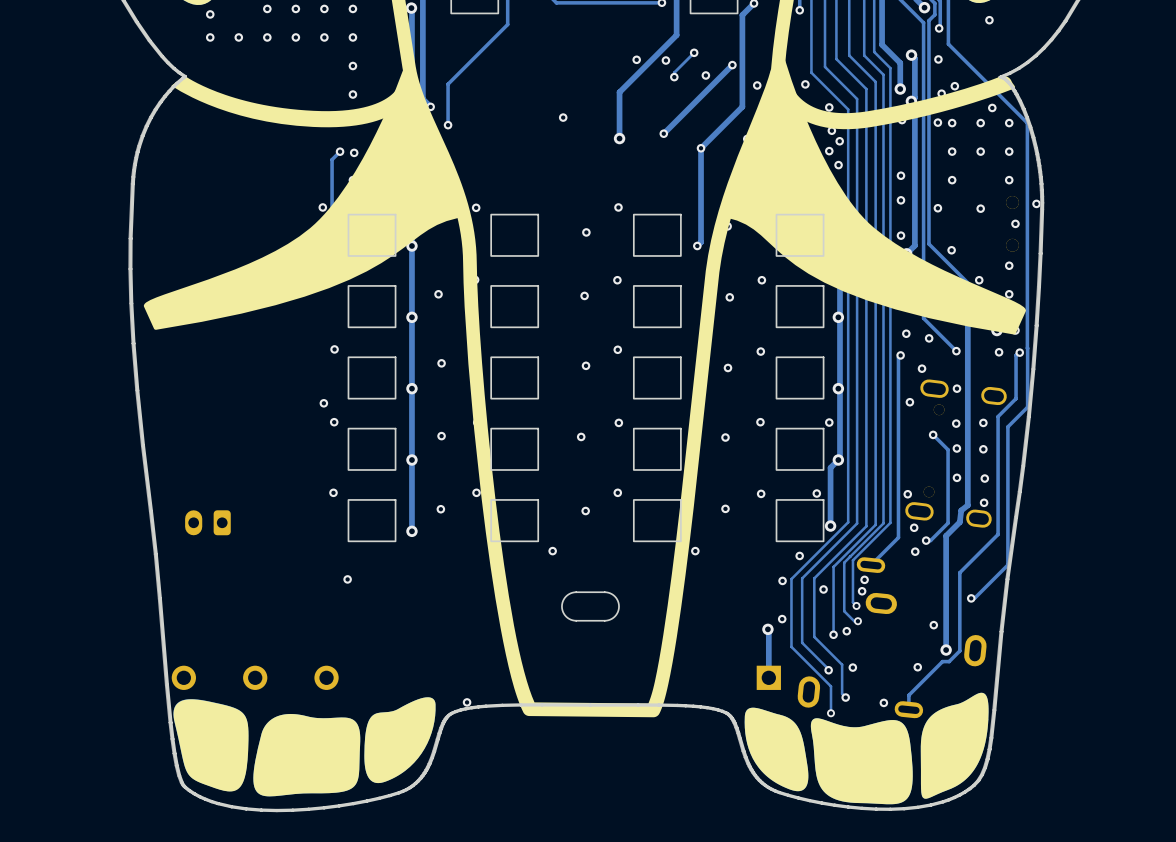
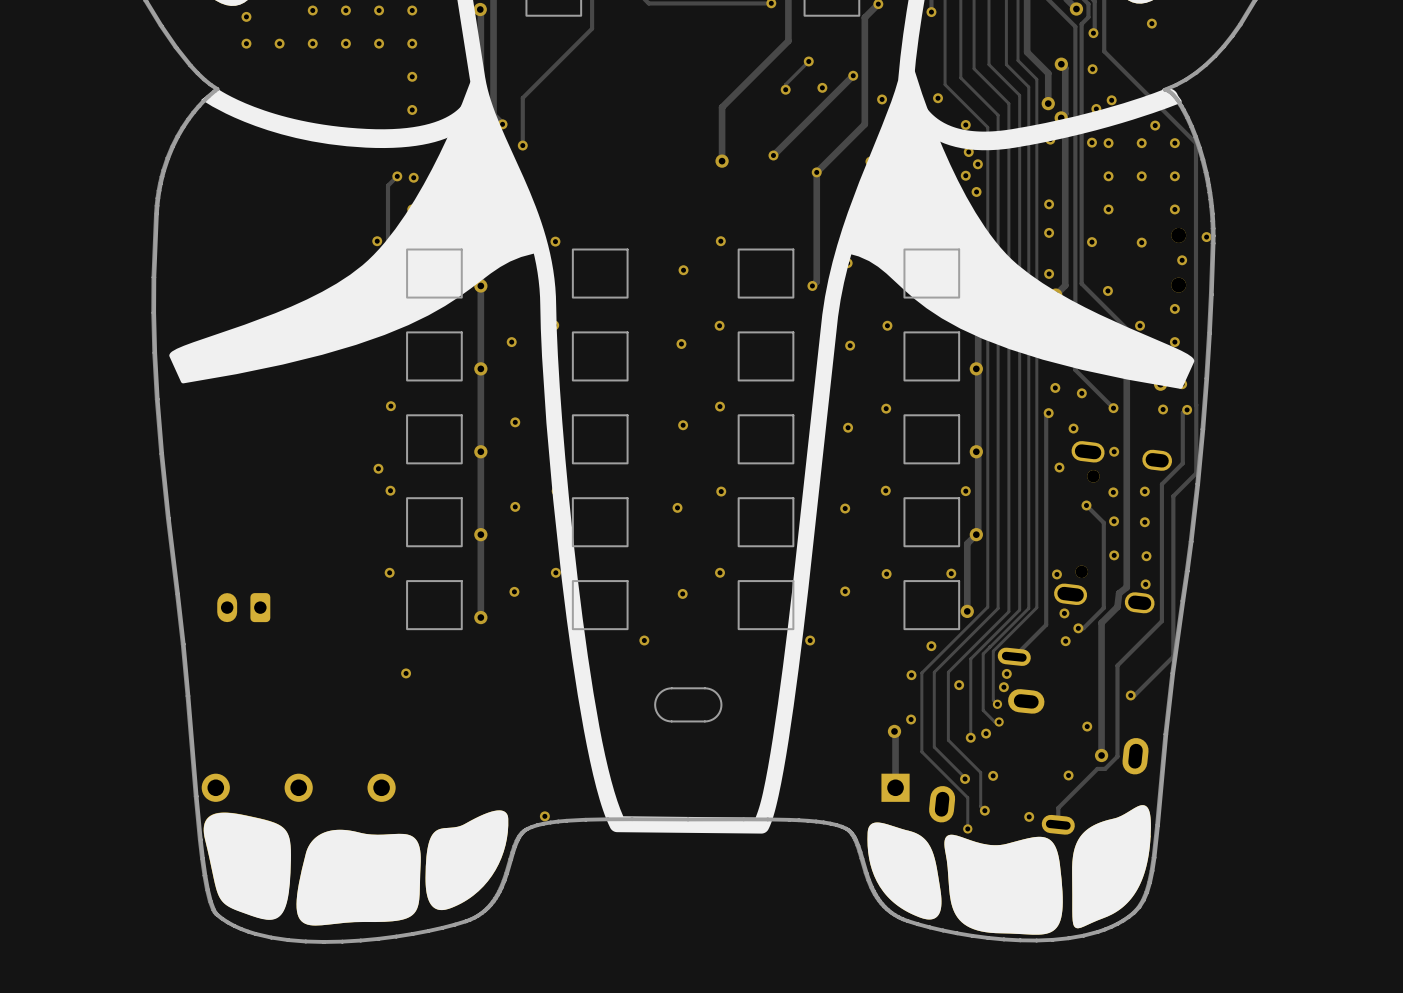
via: (636, 59) -> none
via: (665, 60) -> none
via: (563, 117) -> none

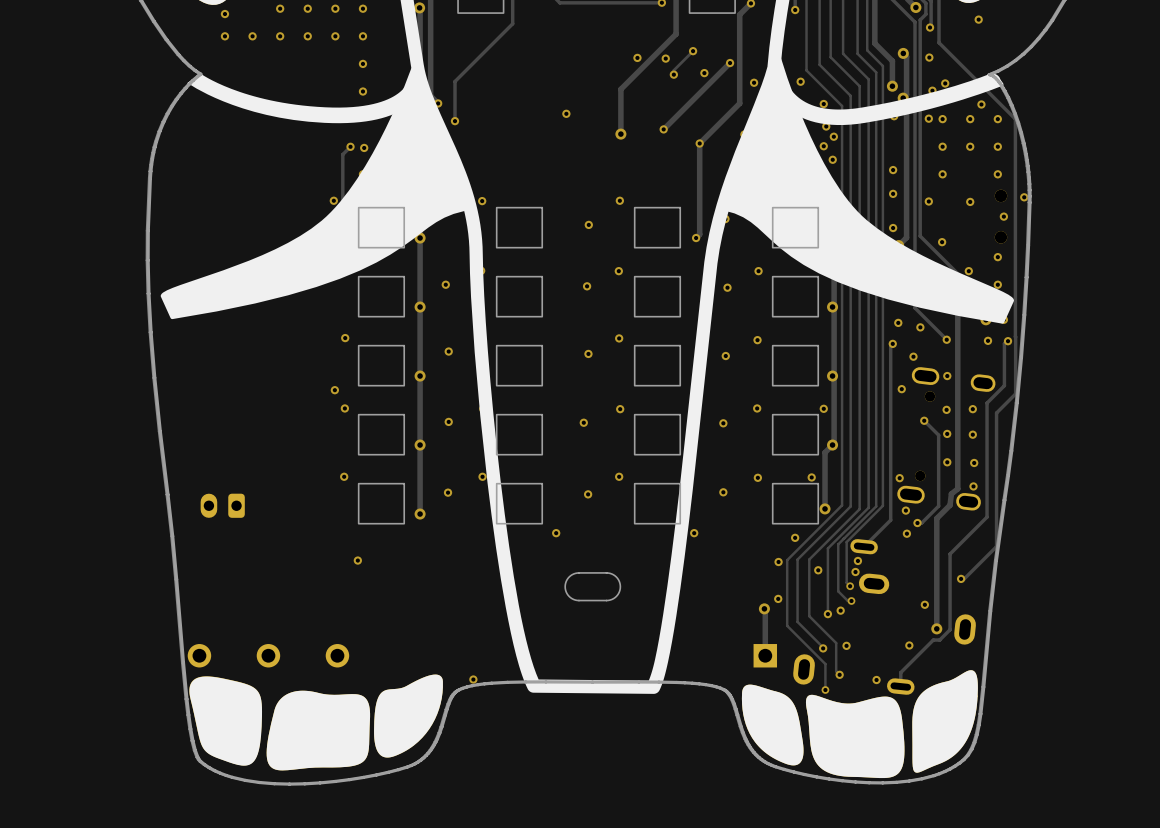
via: none -> (637, 57)
via: none -> (665, 58)
via: none -> (566, 113)

